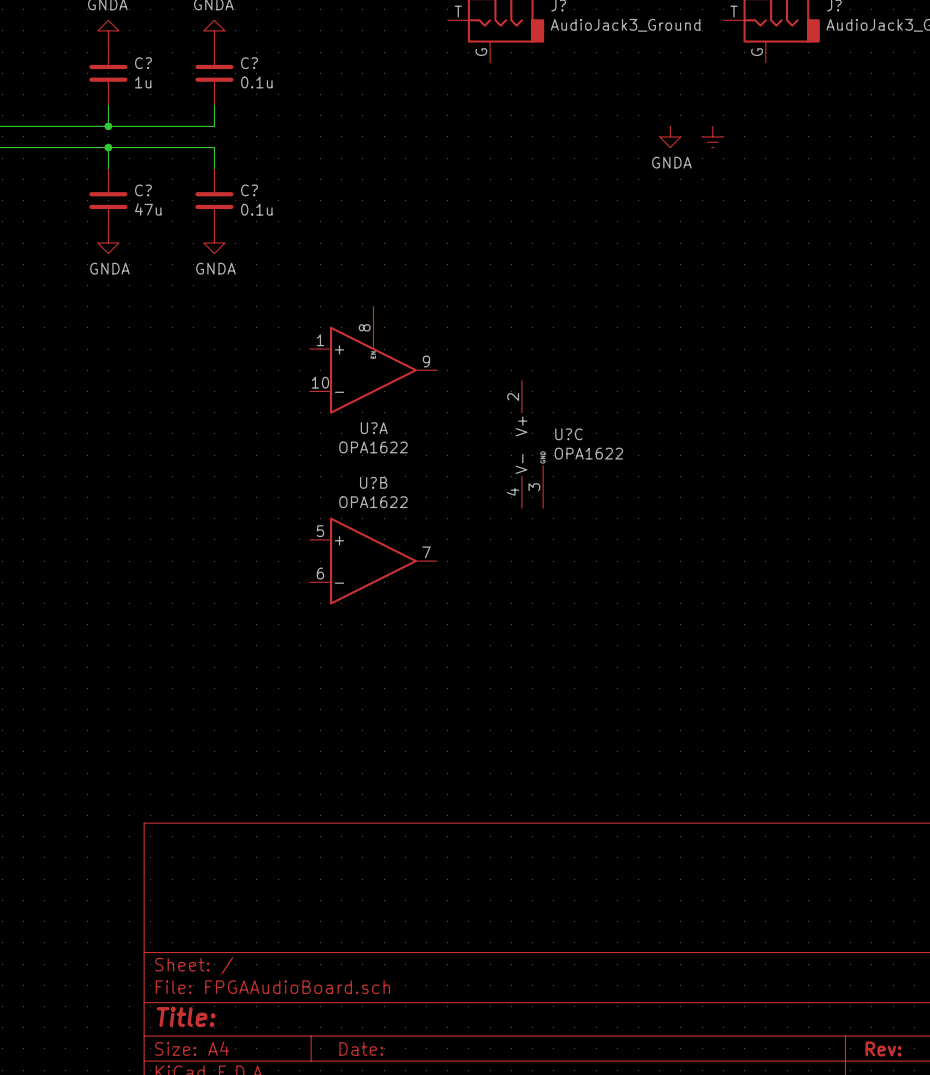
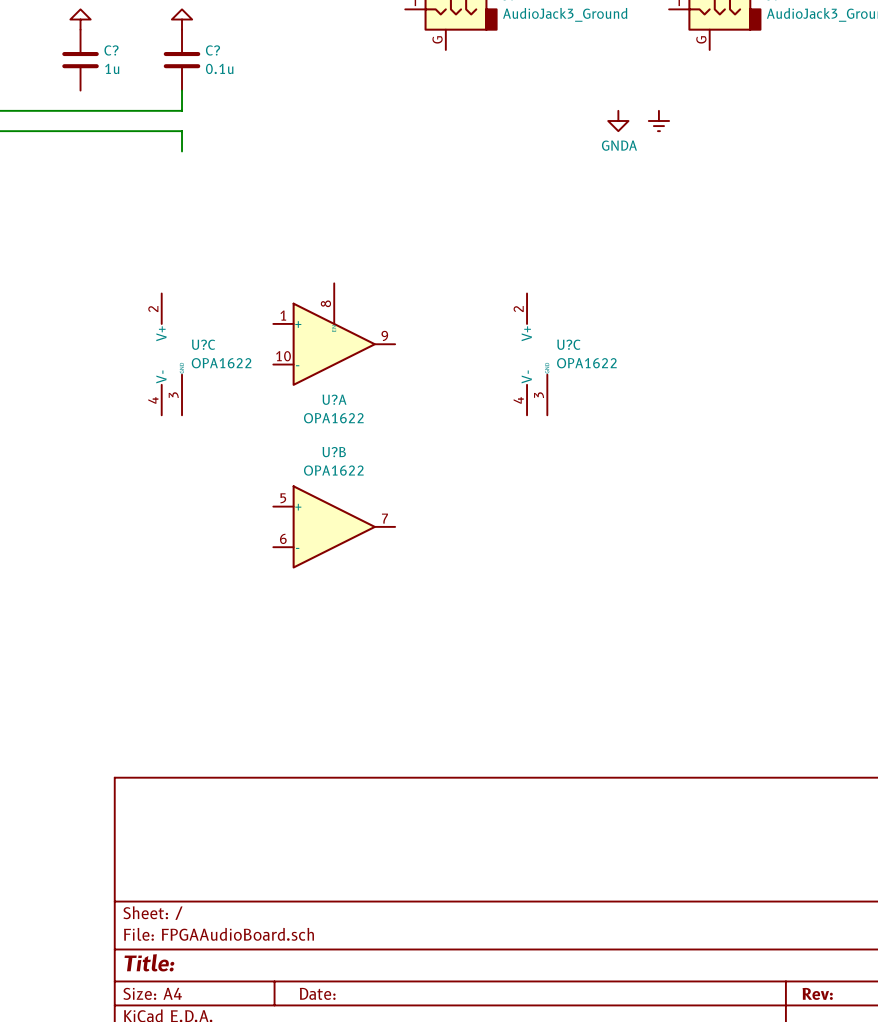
wire: (108, 105) (108, 126) -> none
junction: (108, 126) -> none
wire: (108, 147) (108, 168) -> none
junction: (108, 147) -> none
C?: 47u (108, 200) -> none
C?: 0.1u (214, 200) -> none
power symbol: GNDA (108, 243) -> none
power symbol: GNDA (214, 243) -> none
U?C: none -> OPA1622 (171, 354)
U?C position: (532, 444) -> (537, 354)

